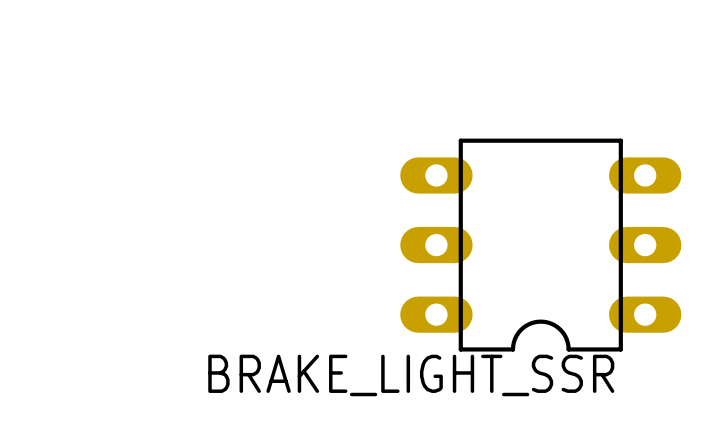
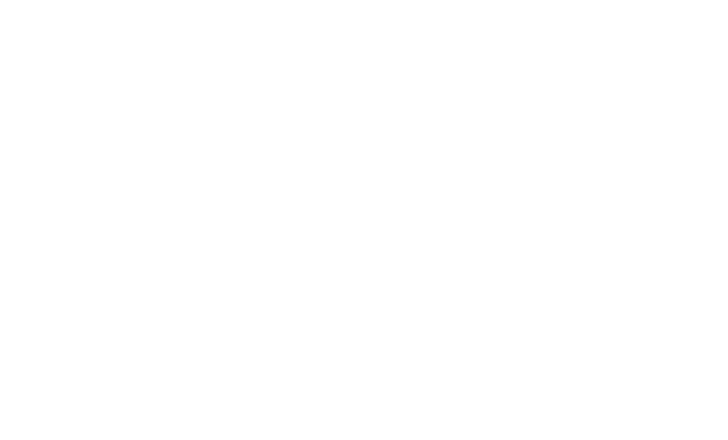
BRAKE_LIGHT_SSR: (540, 245) -> none

